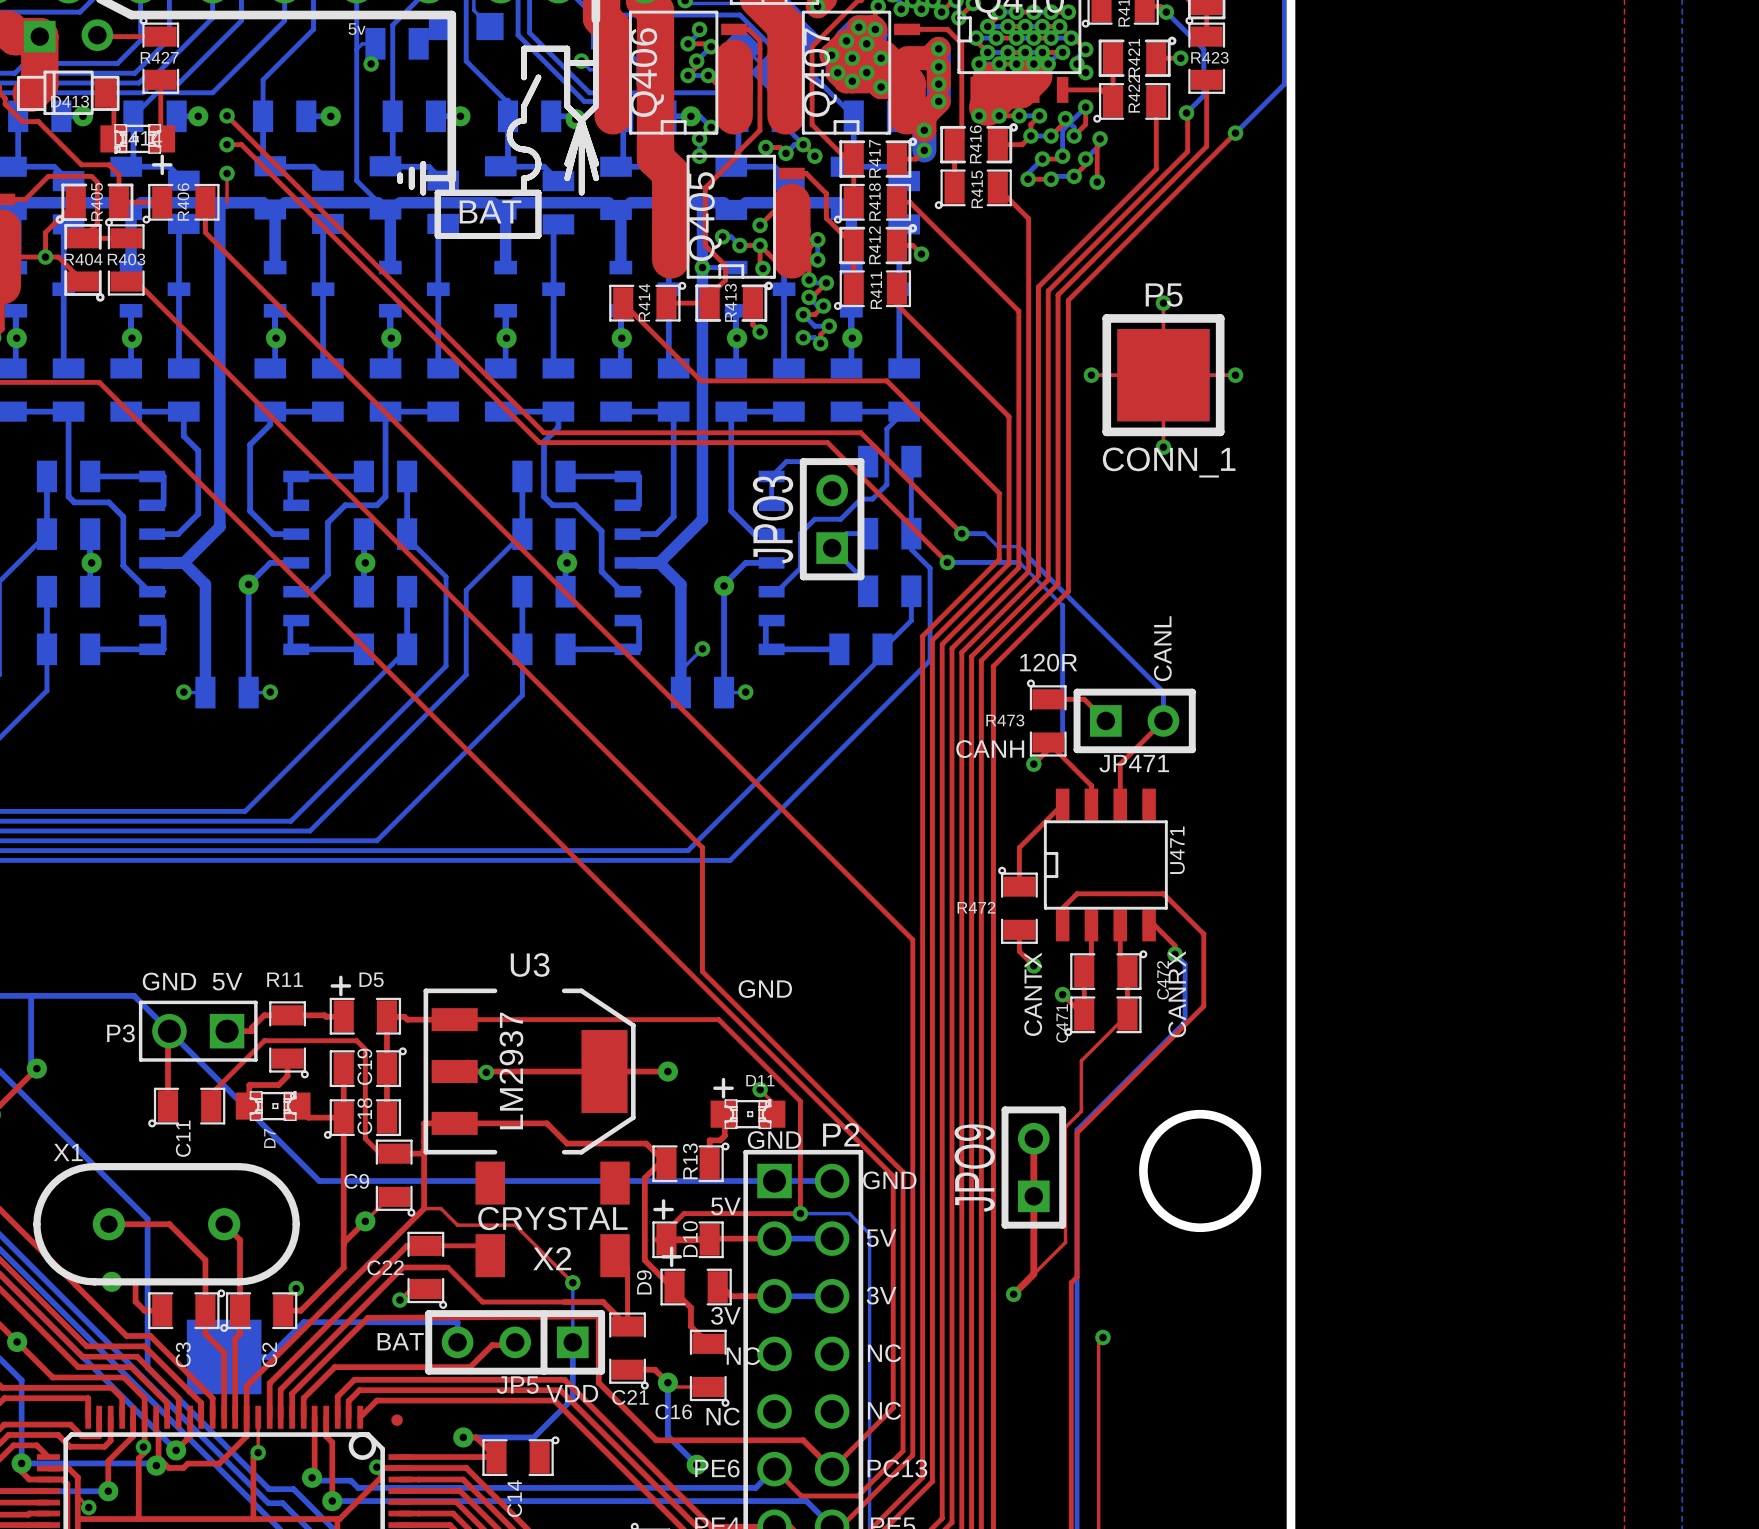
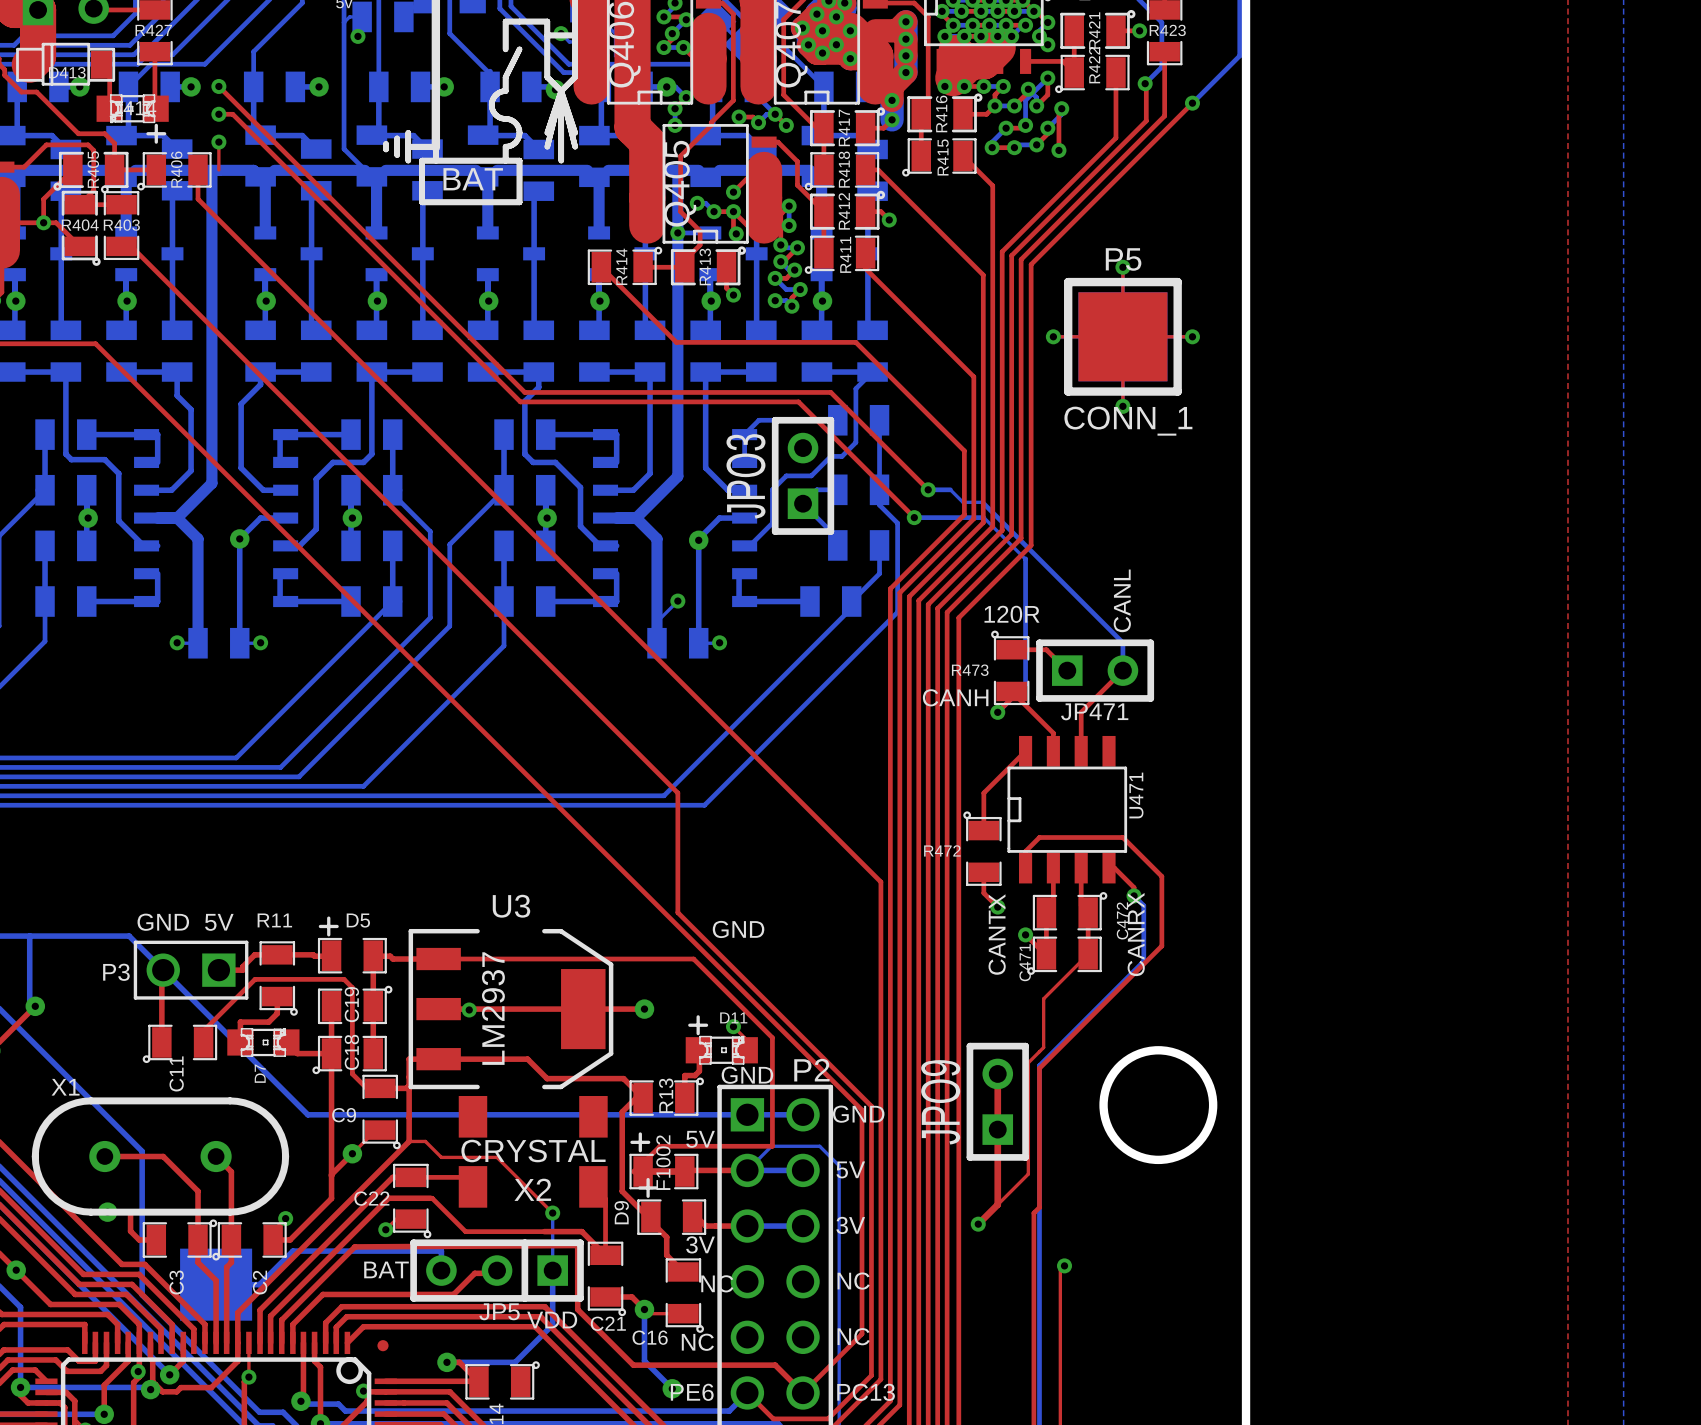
bottom track: none -> (772, 1146) (747, 1170)
via: (800, 1213) -> none
D10 name: D10 (690, 1239) -> F1002 (663, 1162)

